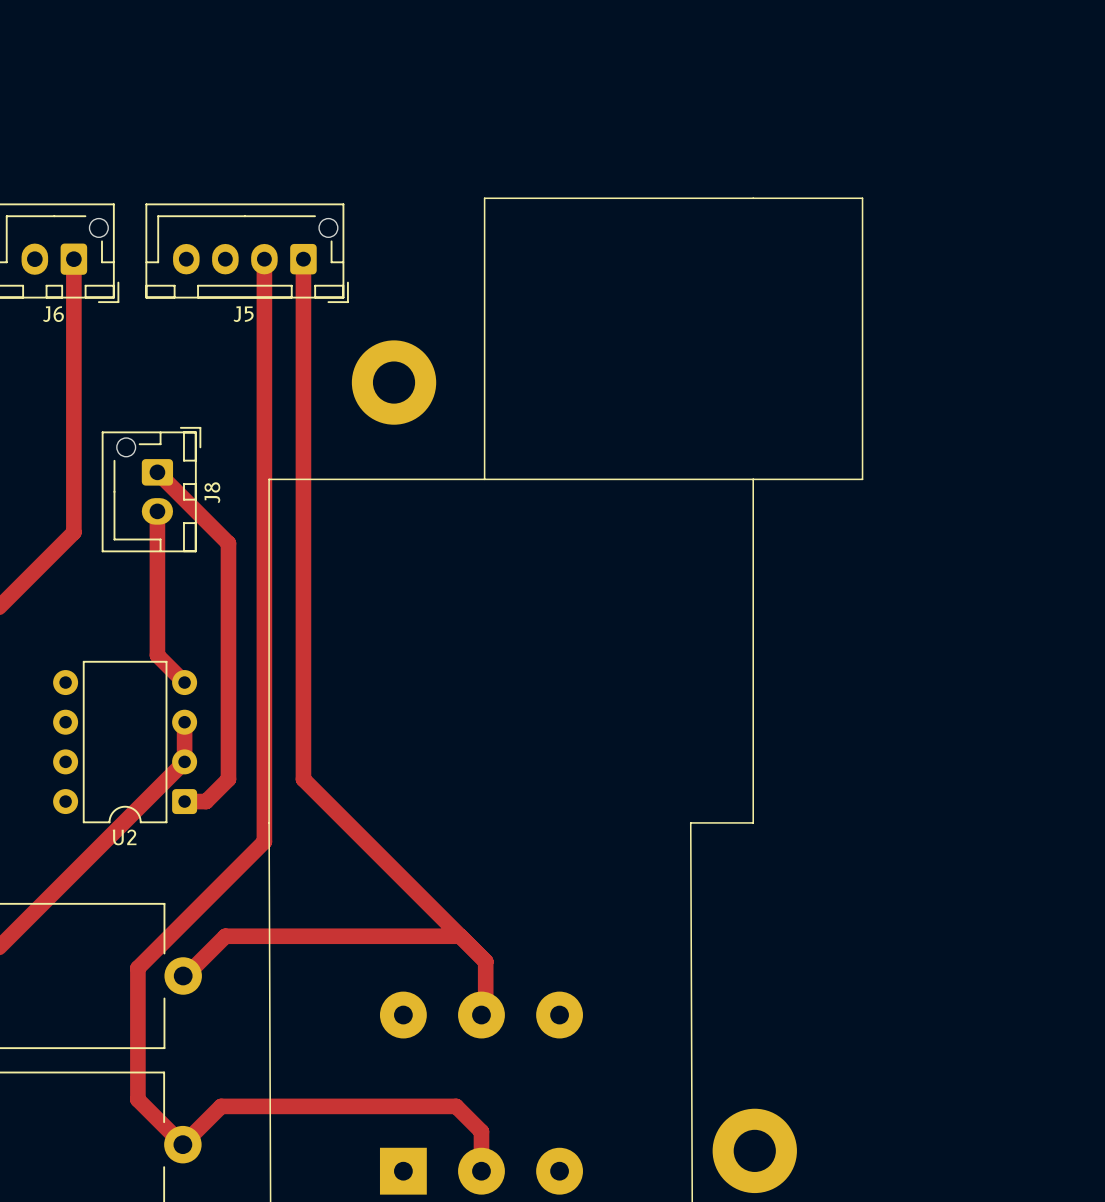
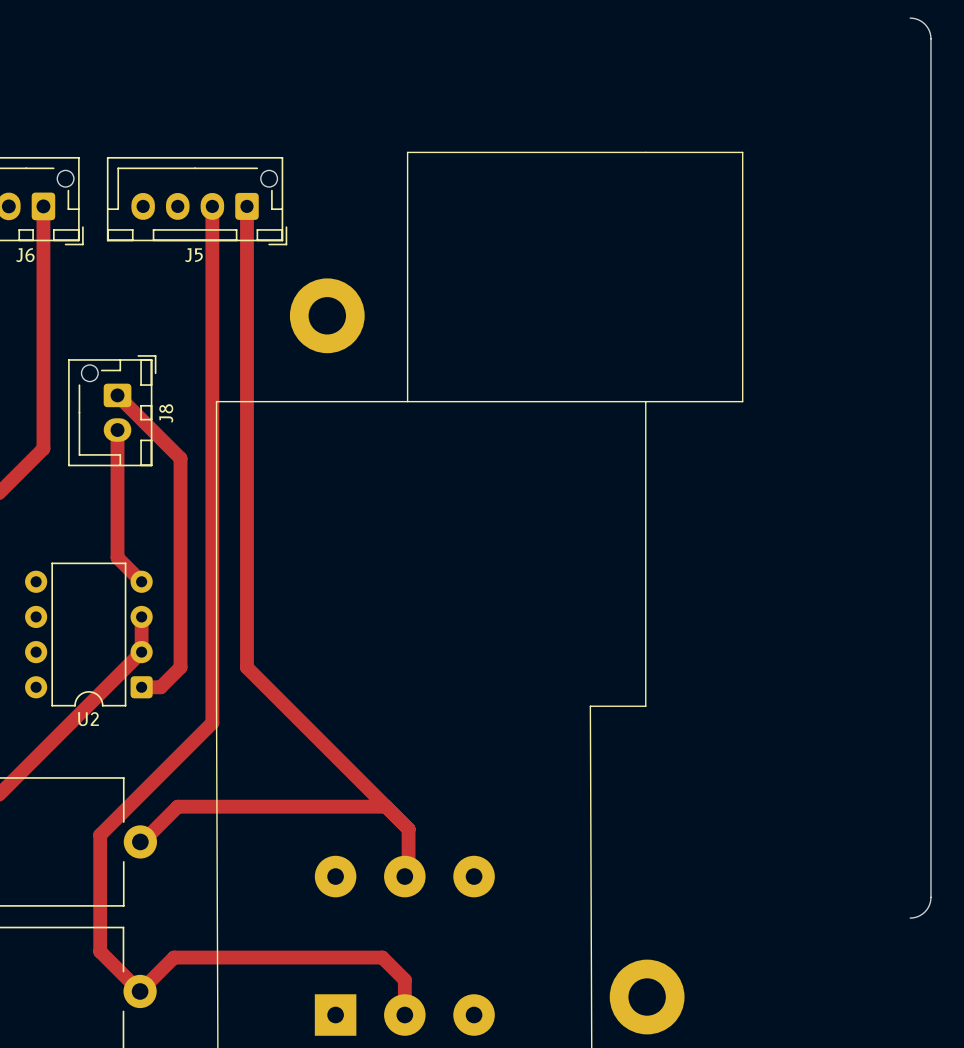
board edge: none -> (910, 18) (918, 19) (924, 24) (929, 30) (930, 38) (930, 897) (929, 905) (924, 912) (918, 916) (910, 918)

